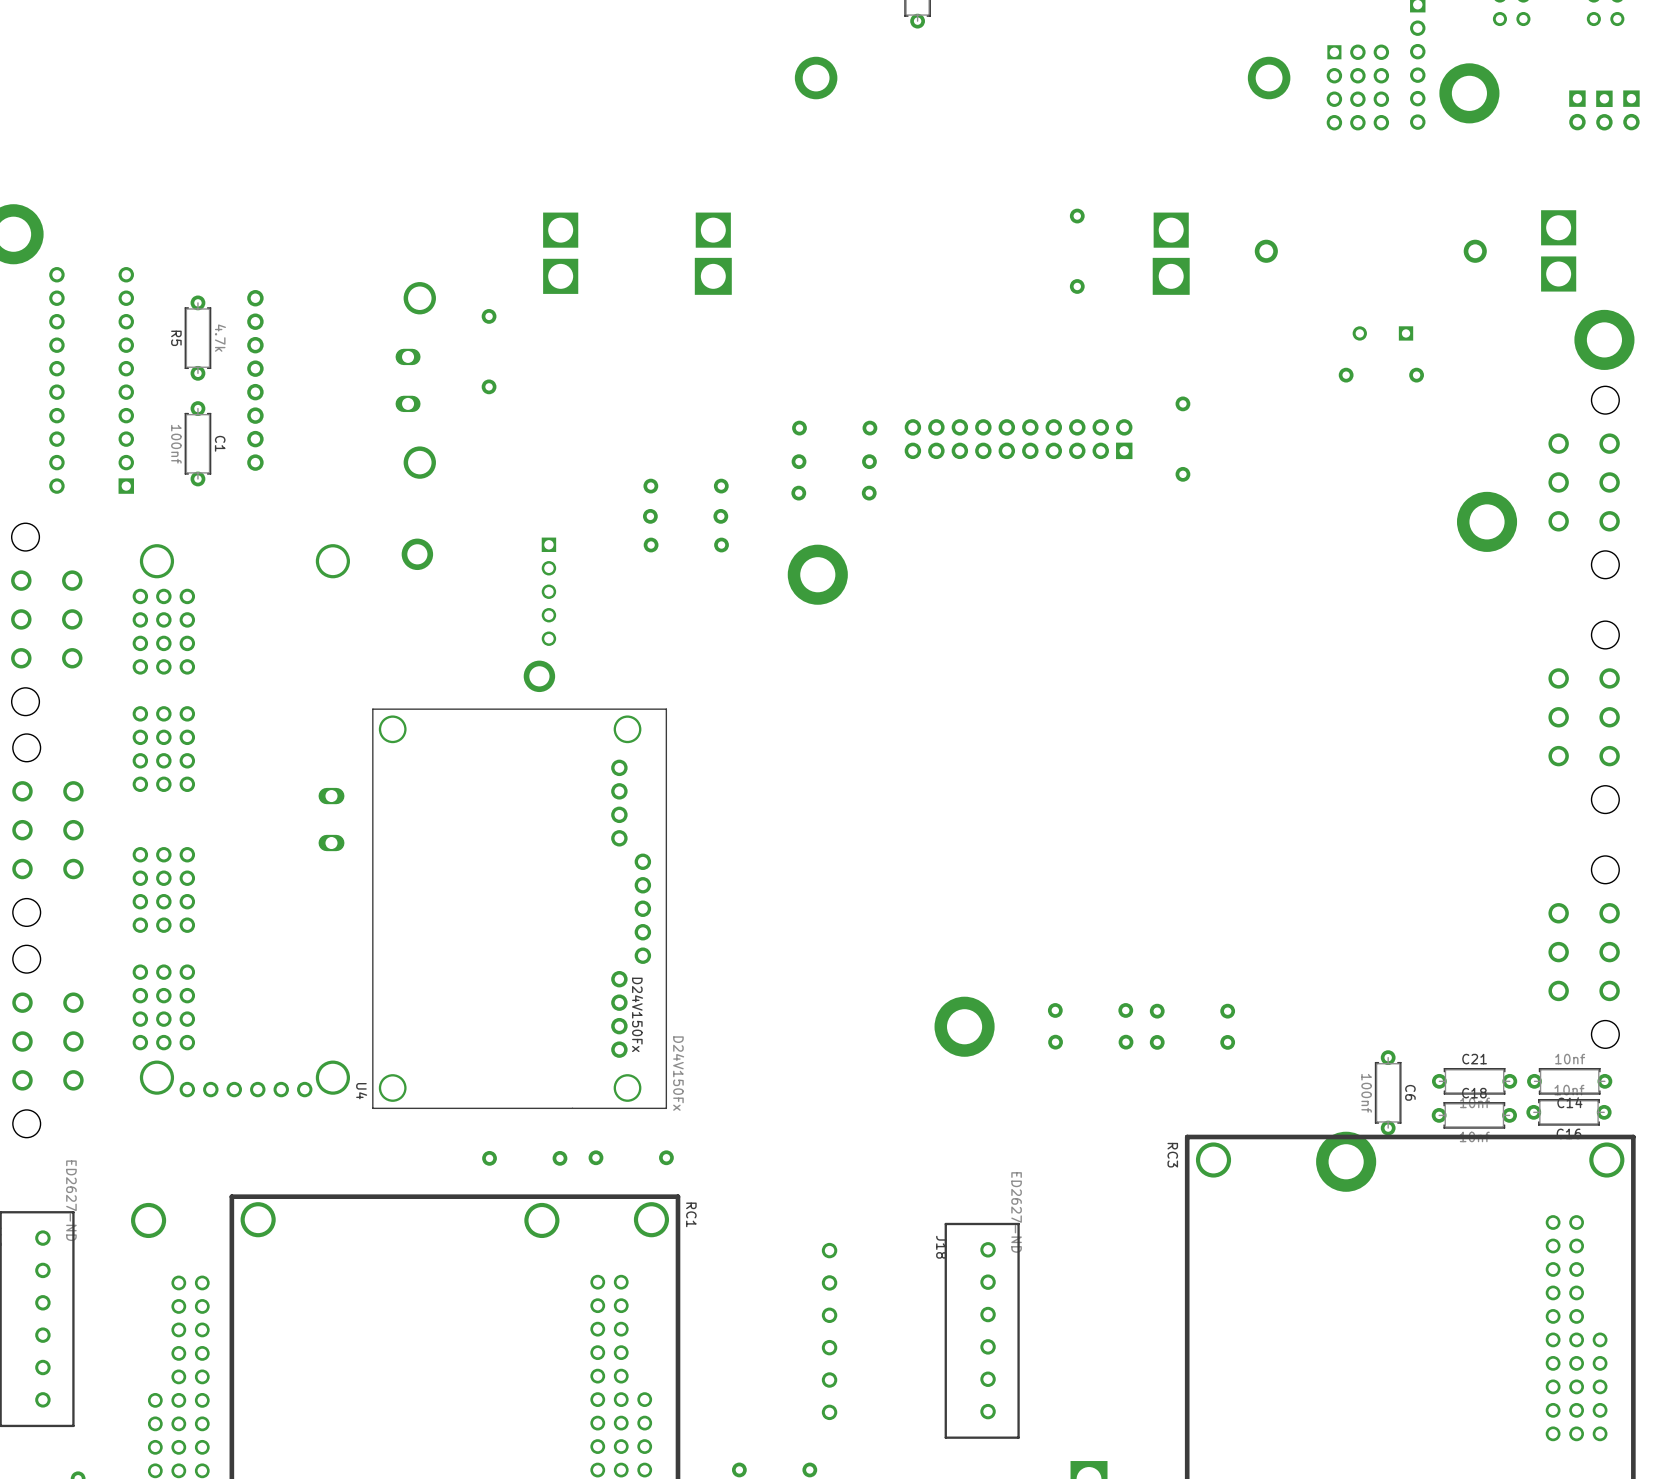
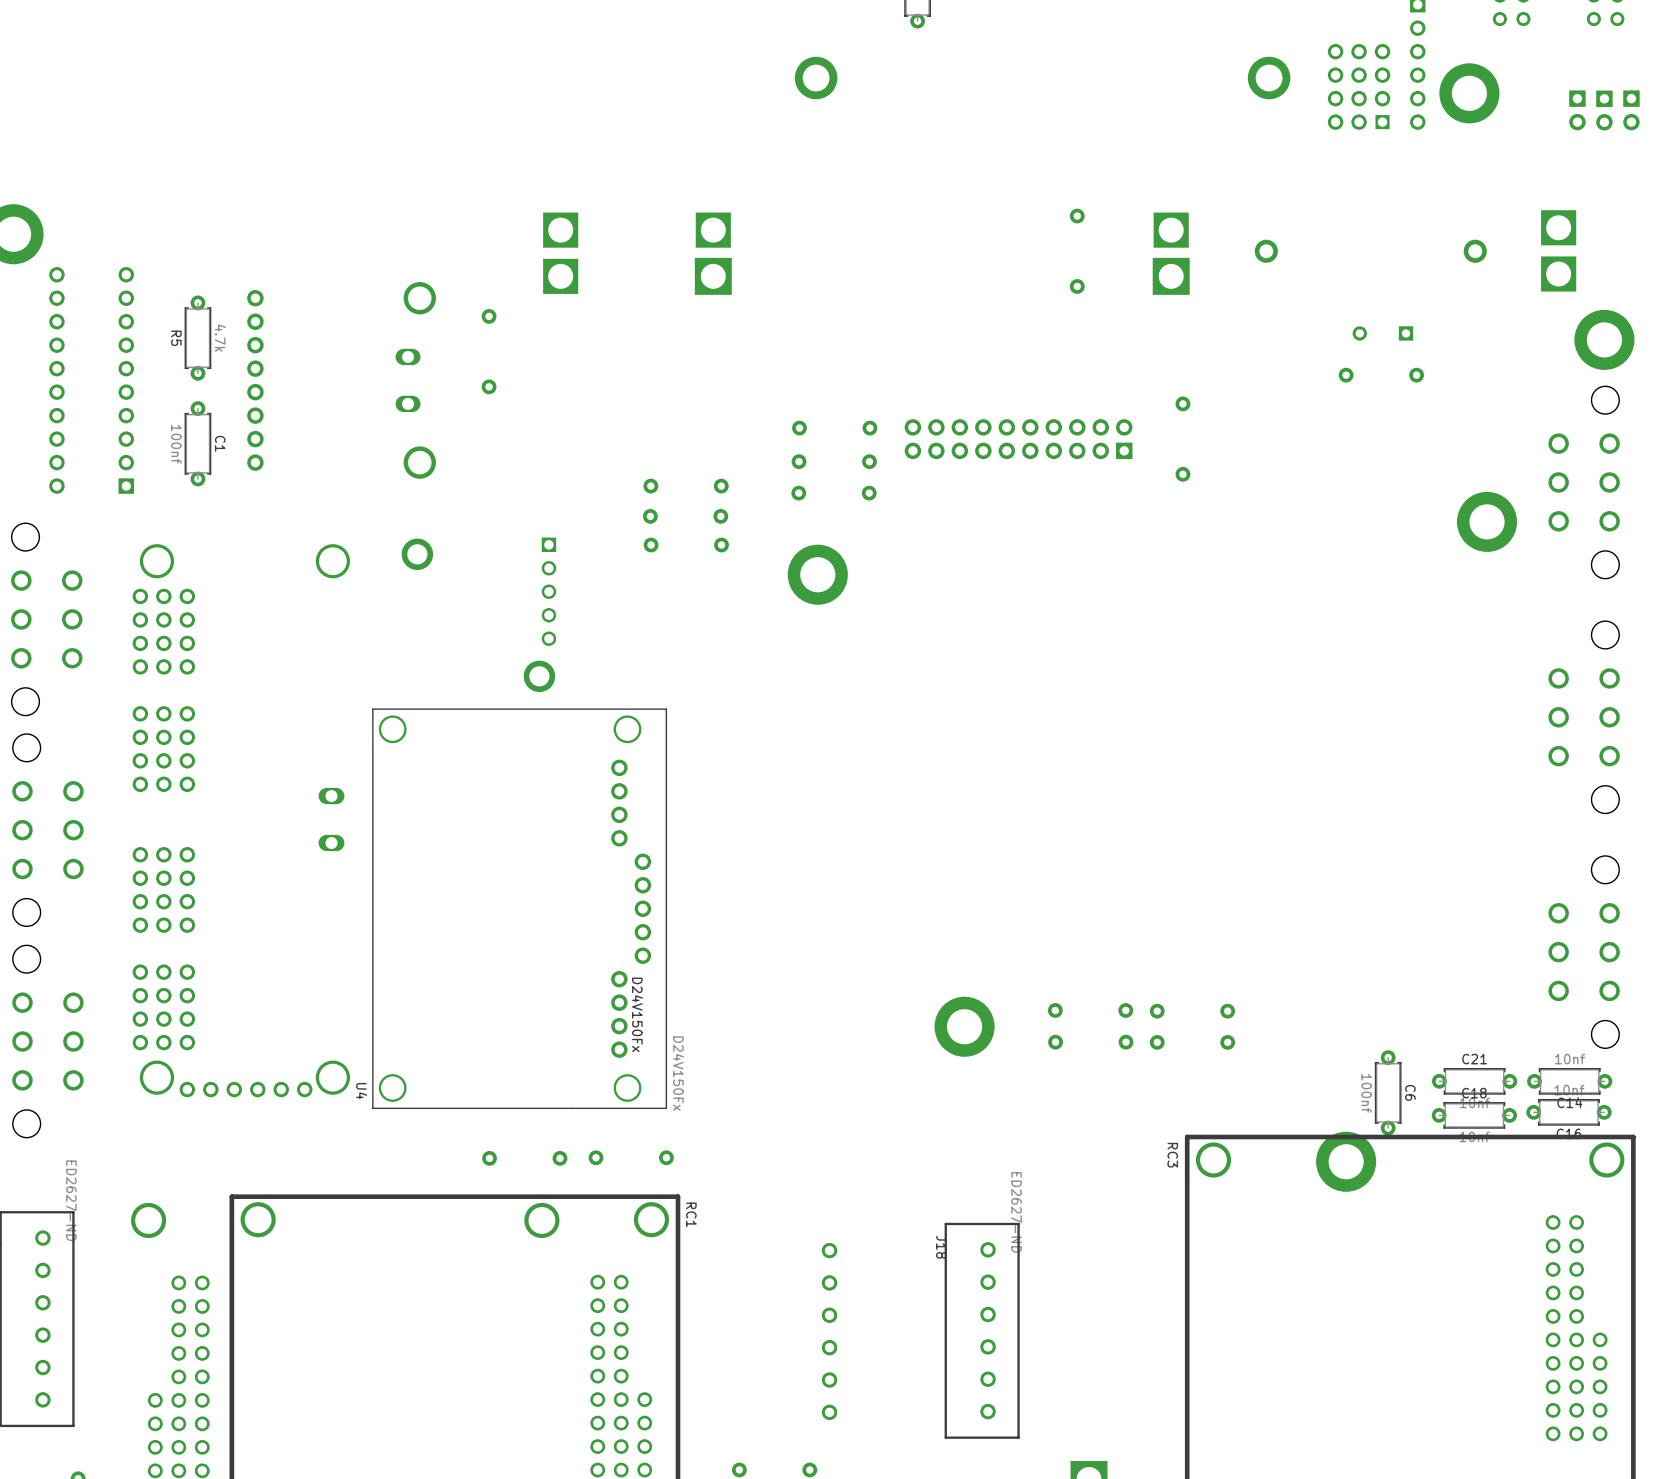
part rotation: 0° (1357, 87) -> 180° (1359, 86)

